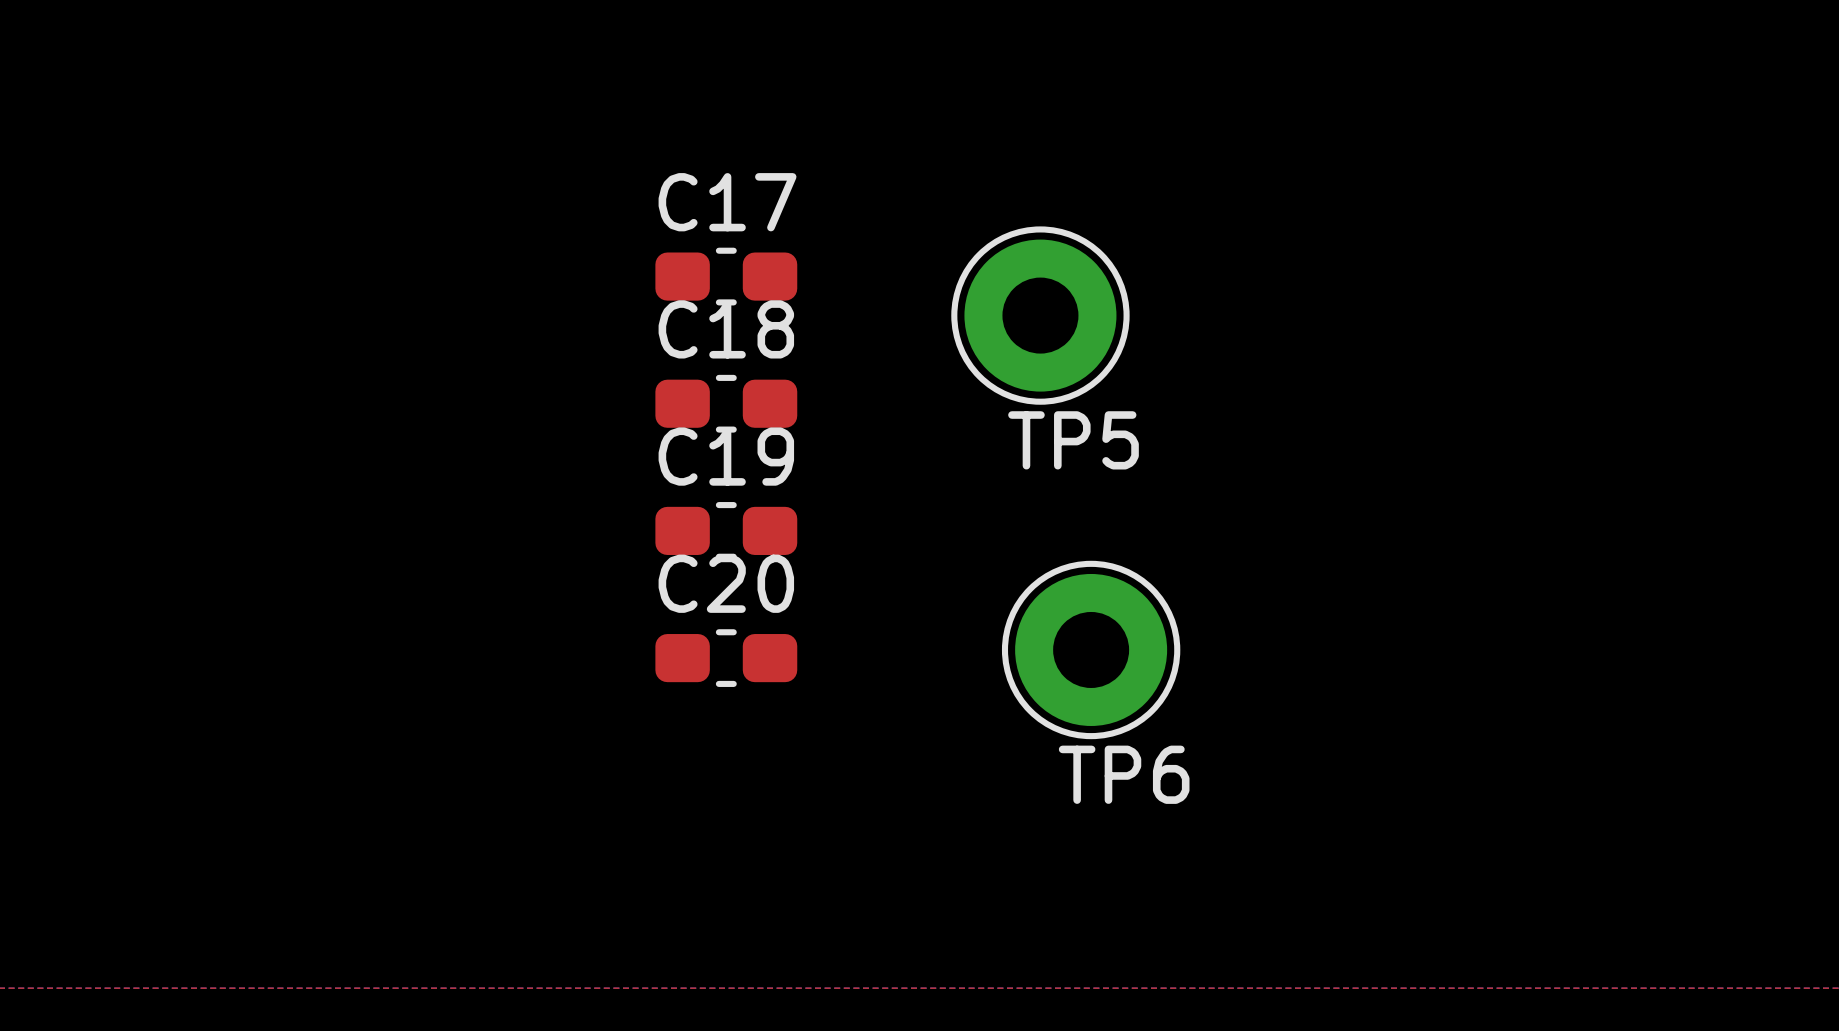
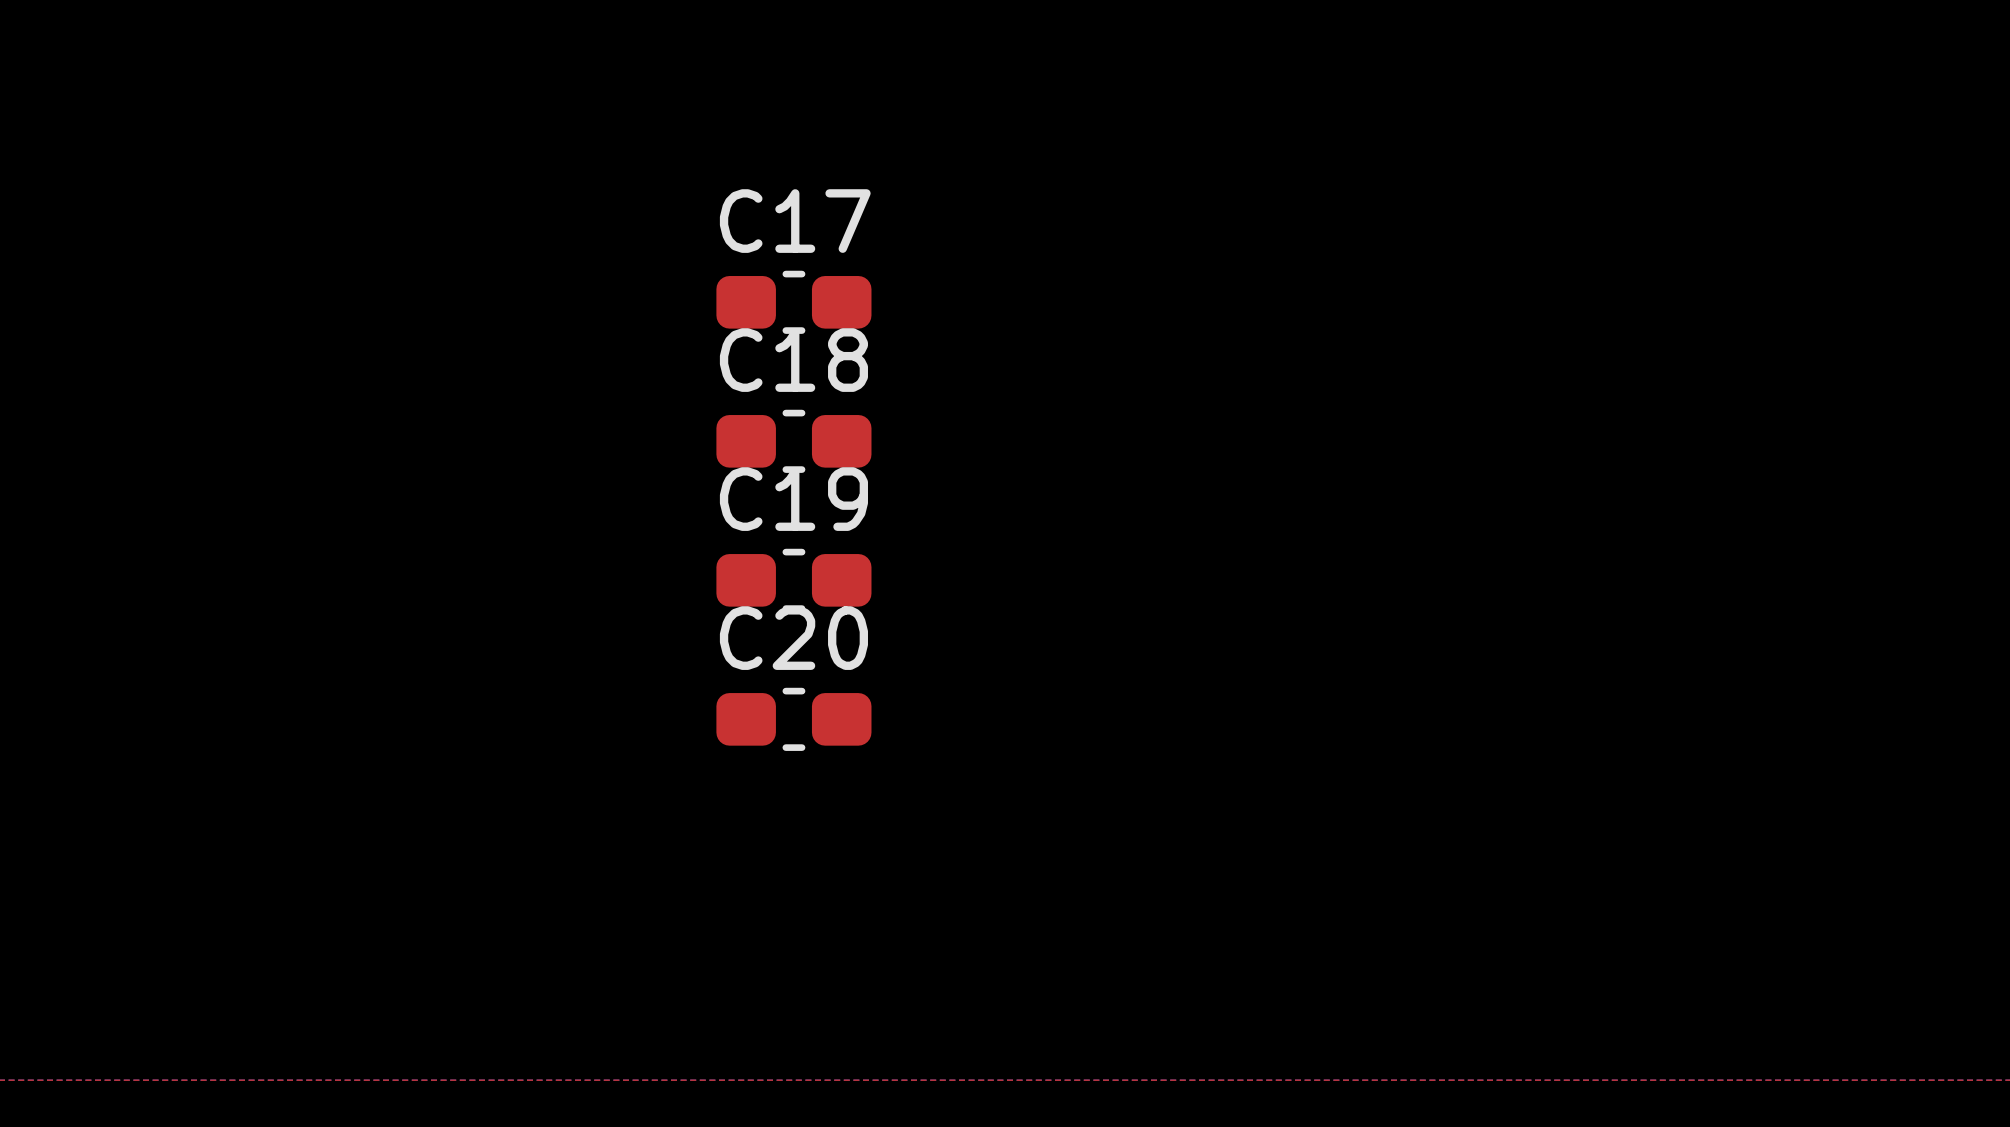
TP5: (1040, 315) -> none
TP6: (1091, 649) -> none

